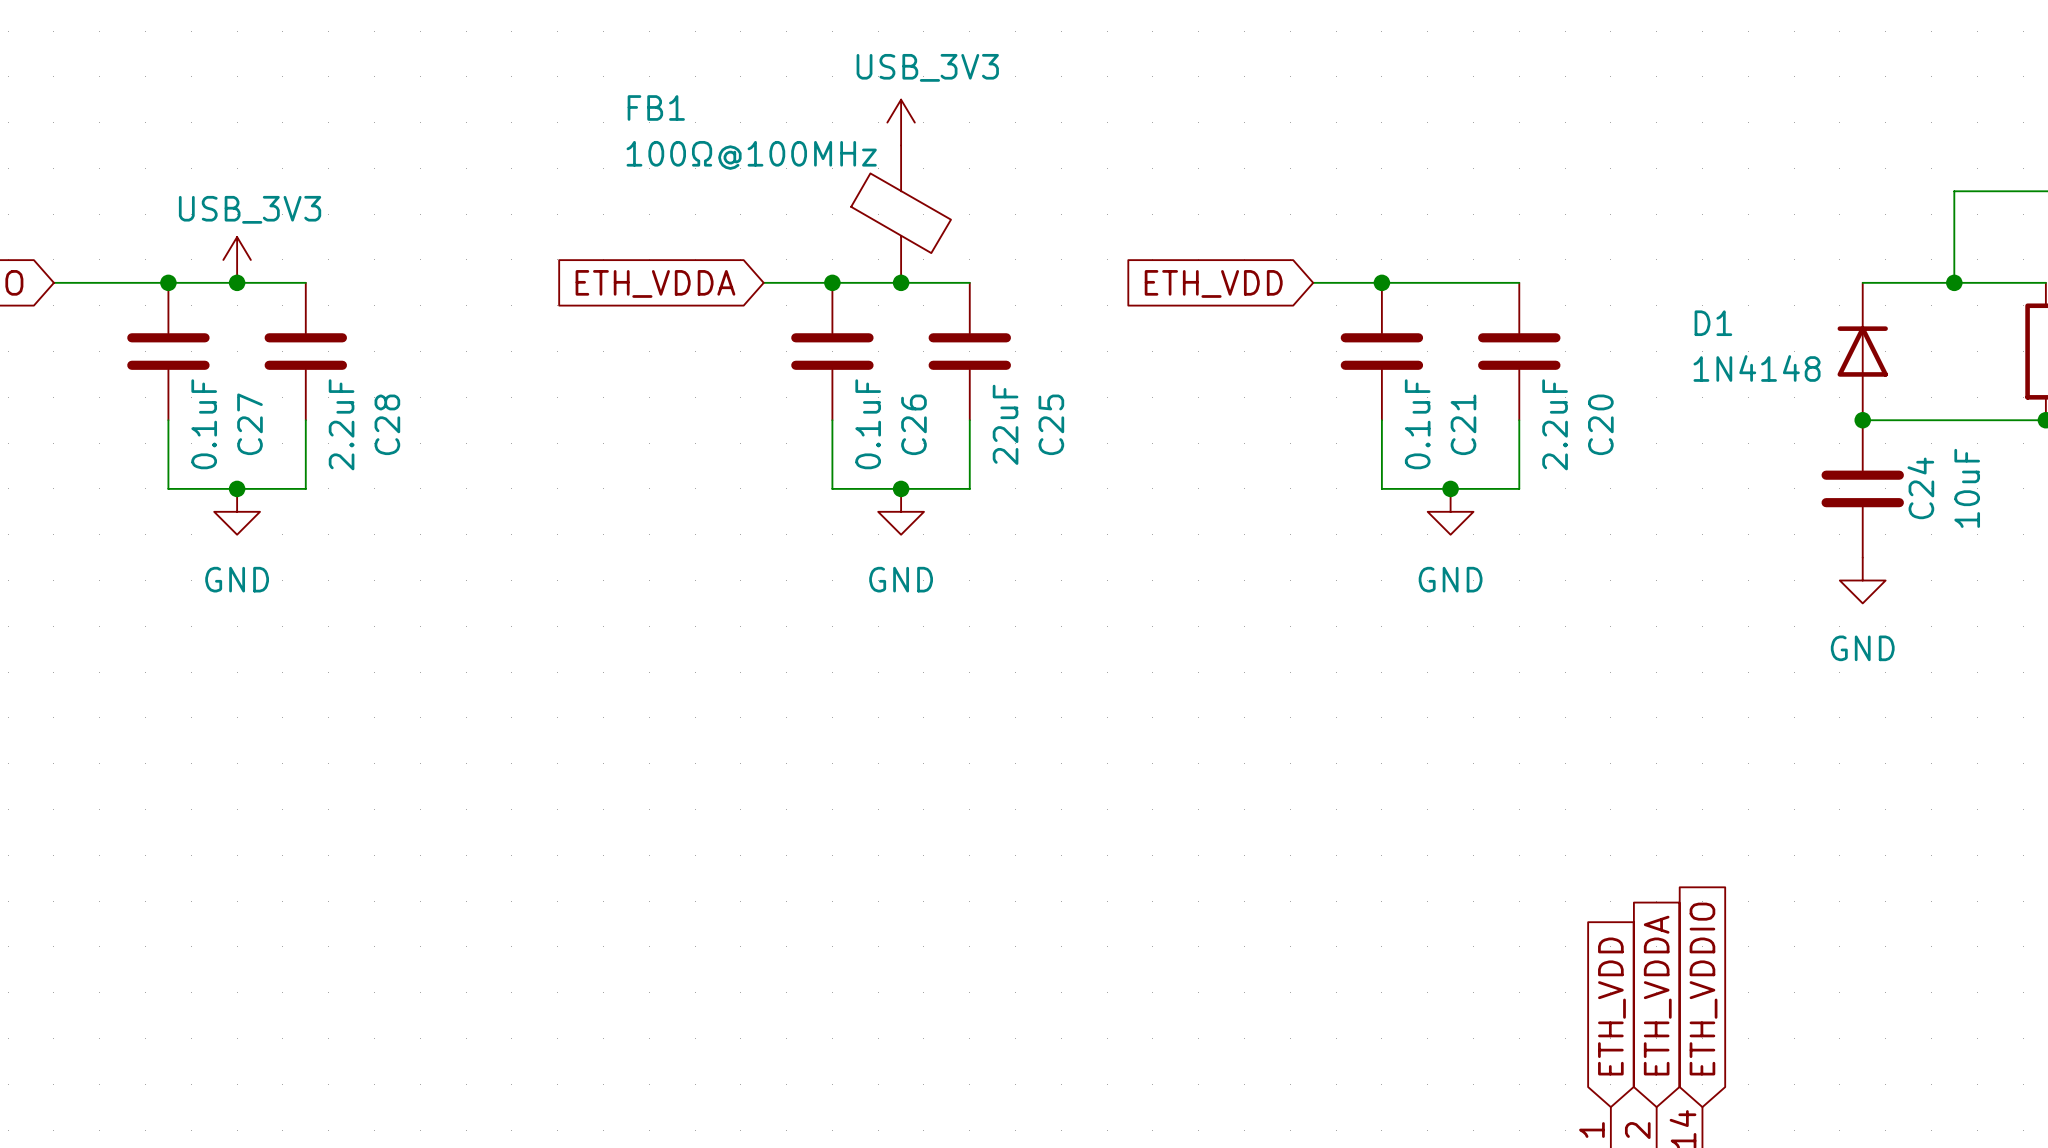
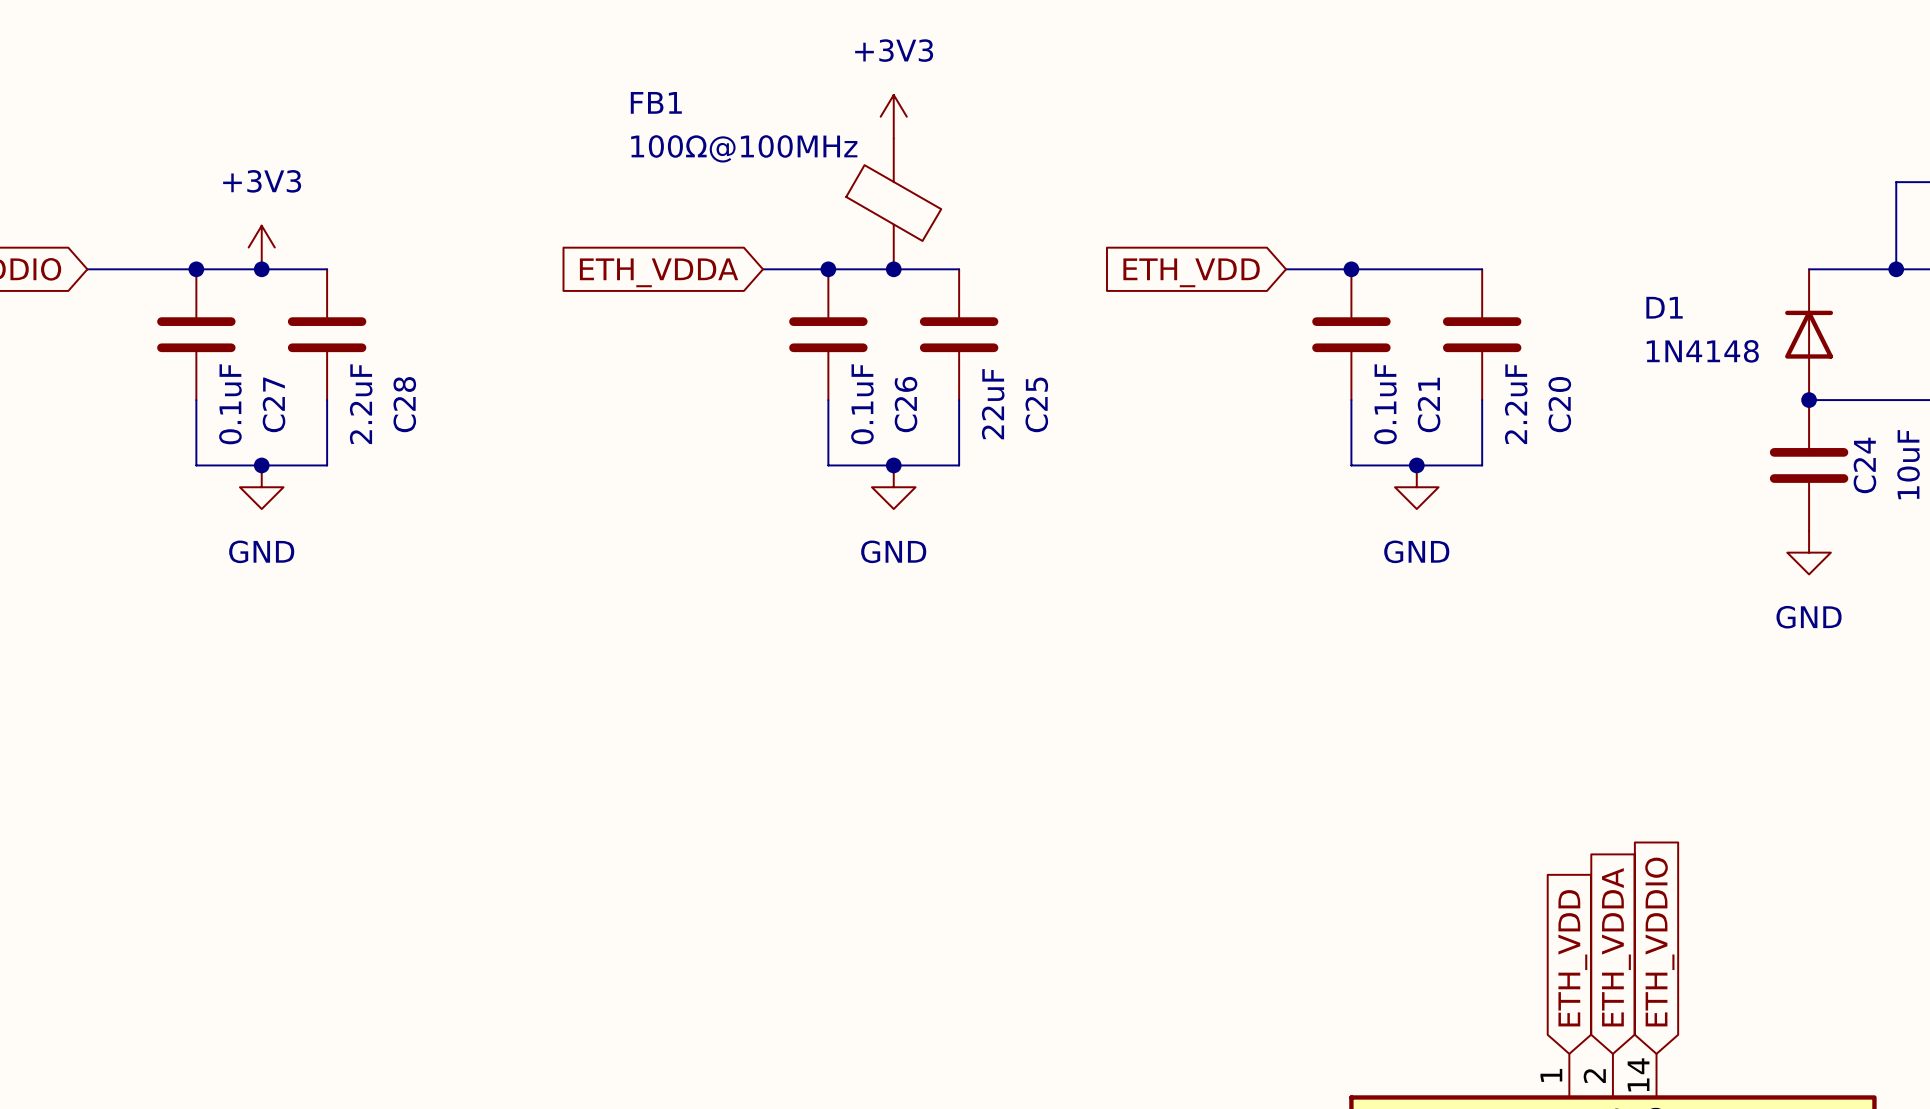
power symbol: USB_3V3 (901, 122) -> +3V3 (893, 116)
power symbol: USB_3V3 (237, 259) -> +3V3 (261, 247)

